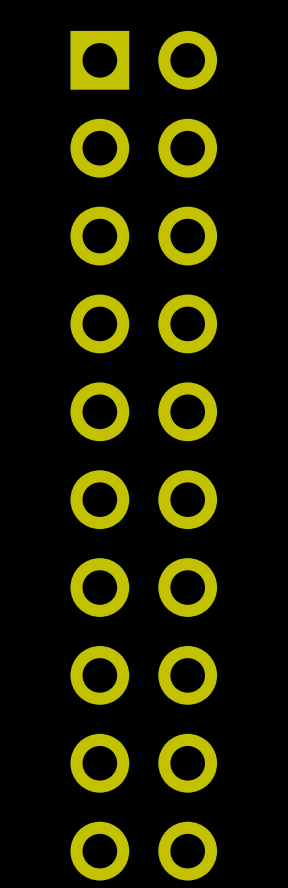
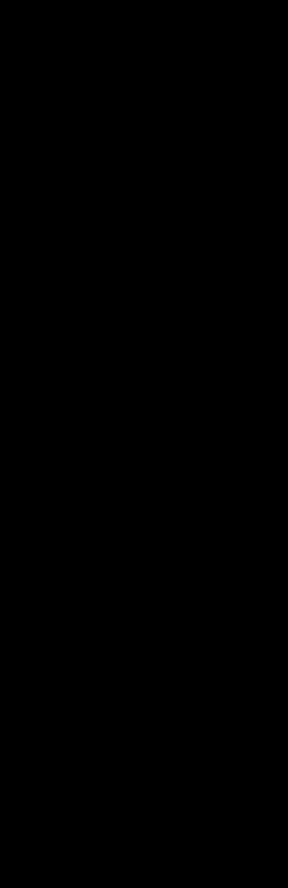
part: (143, 455) -> none

